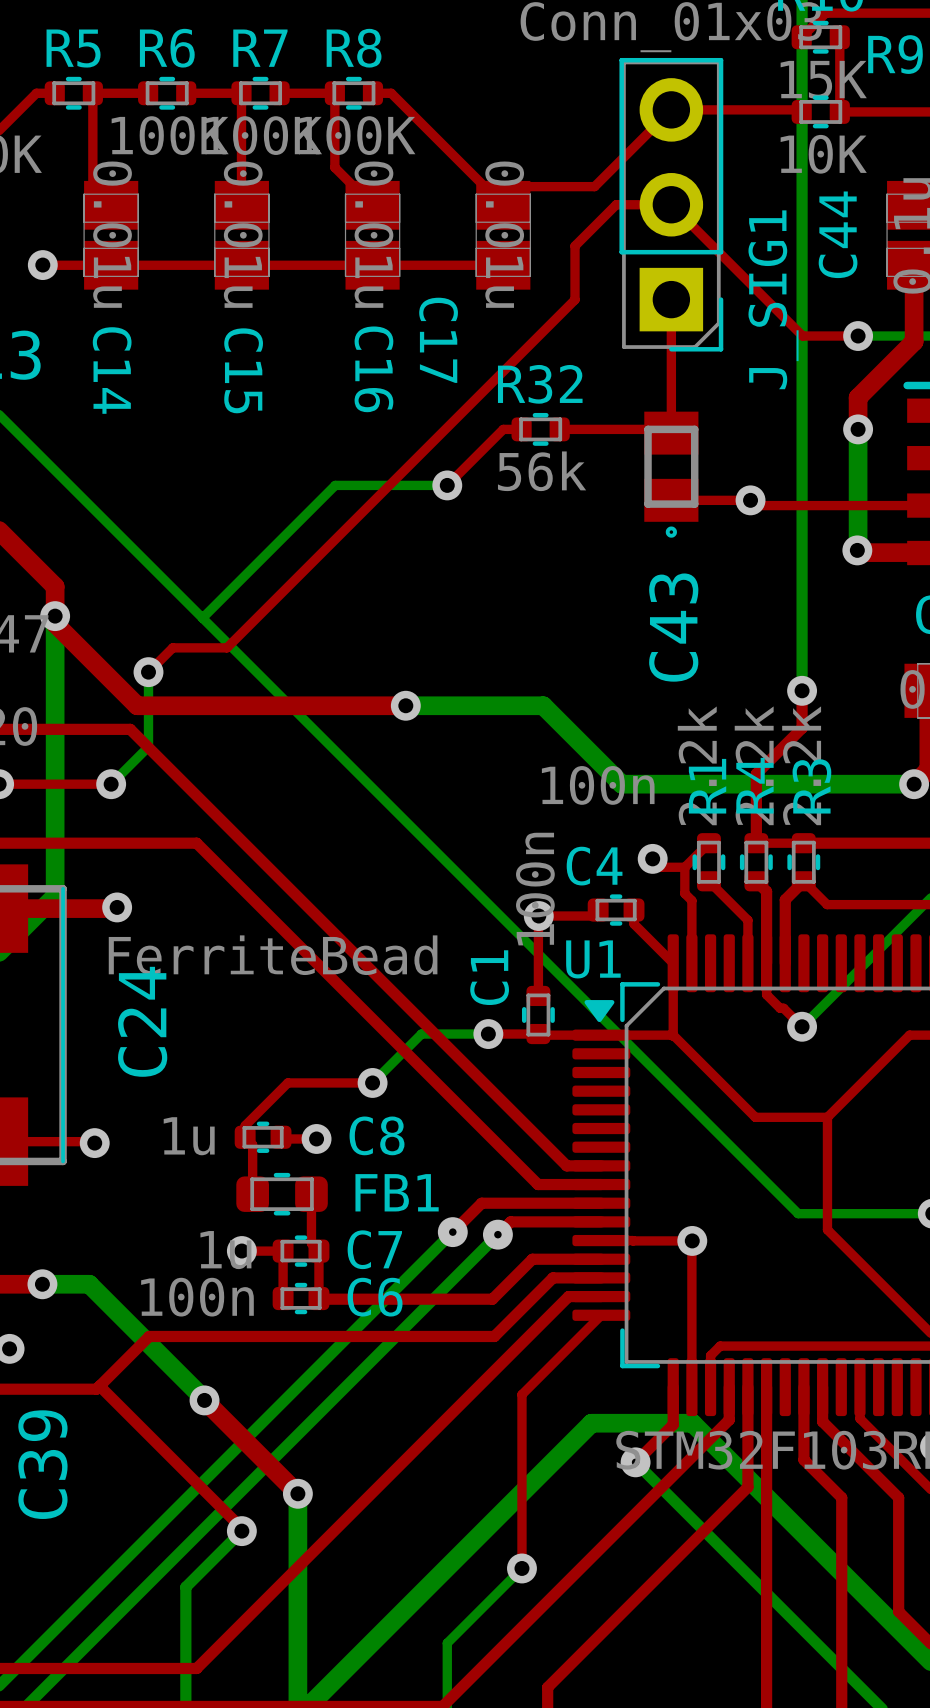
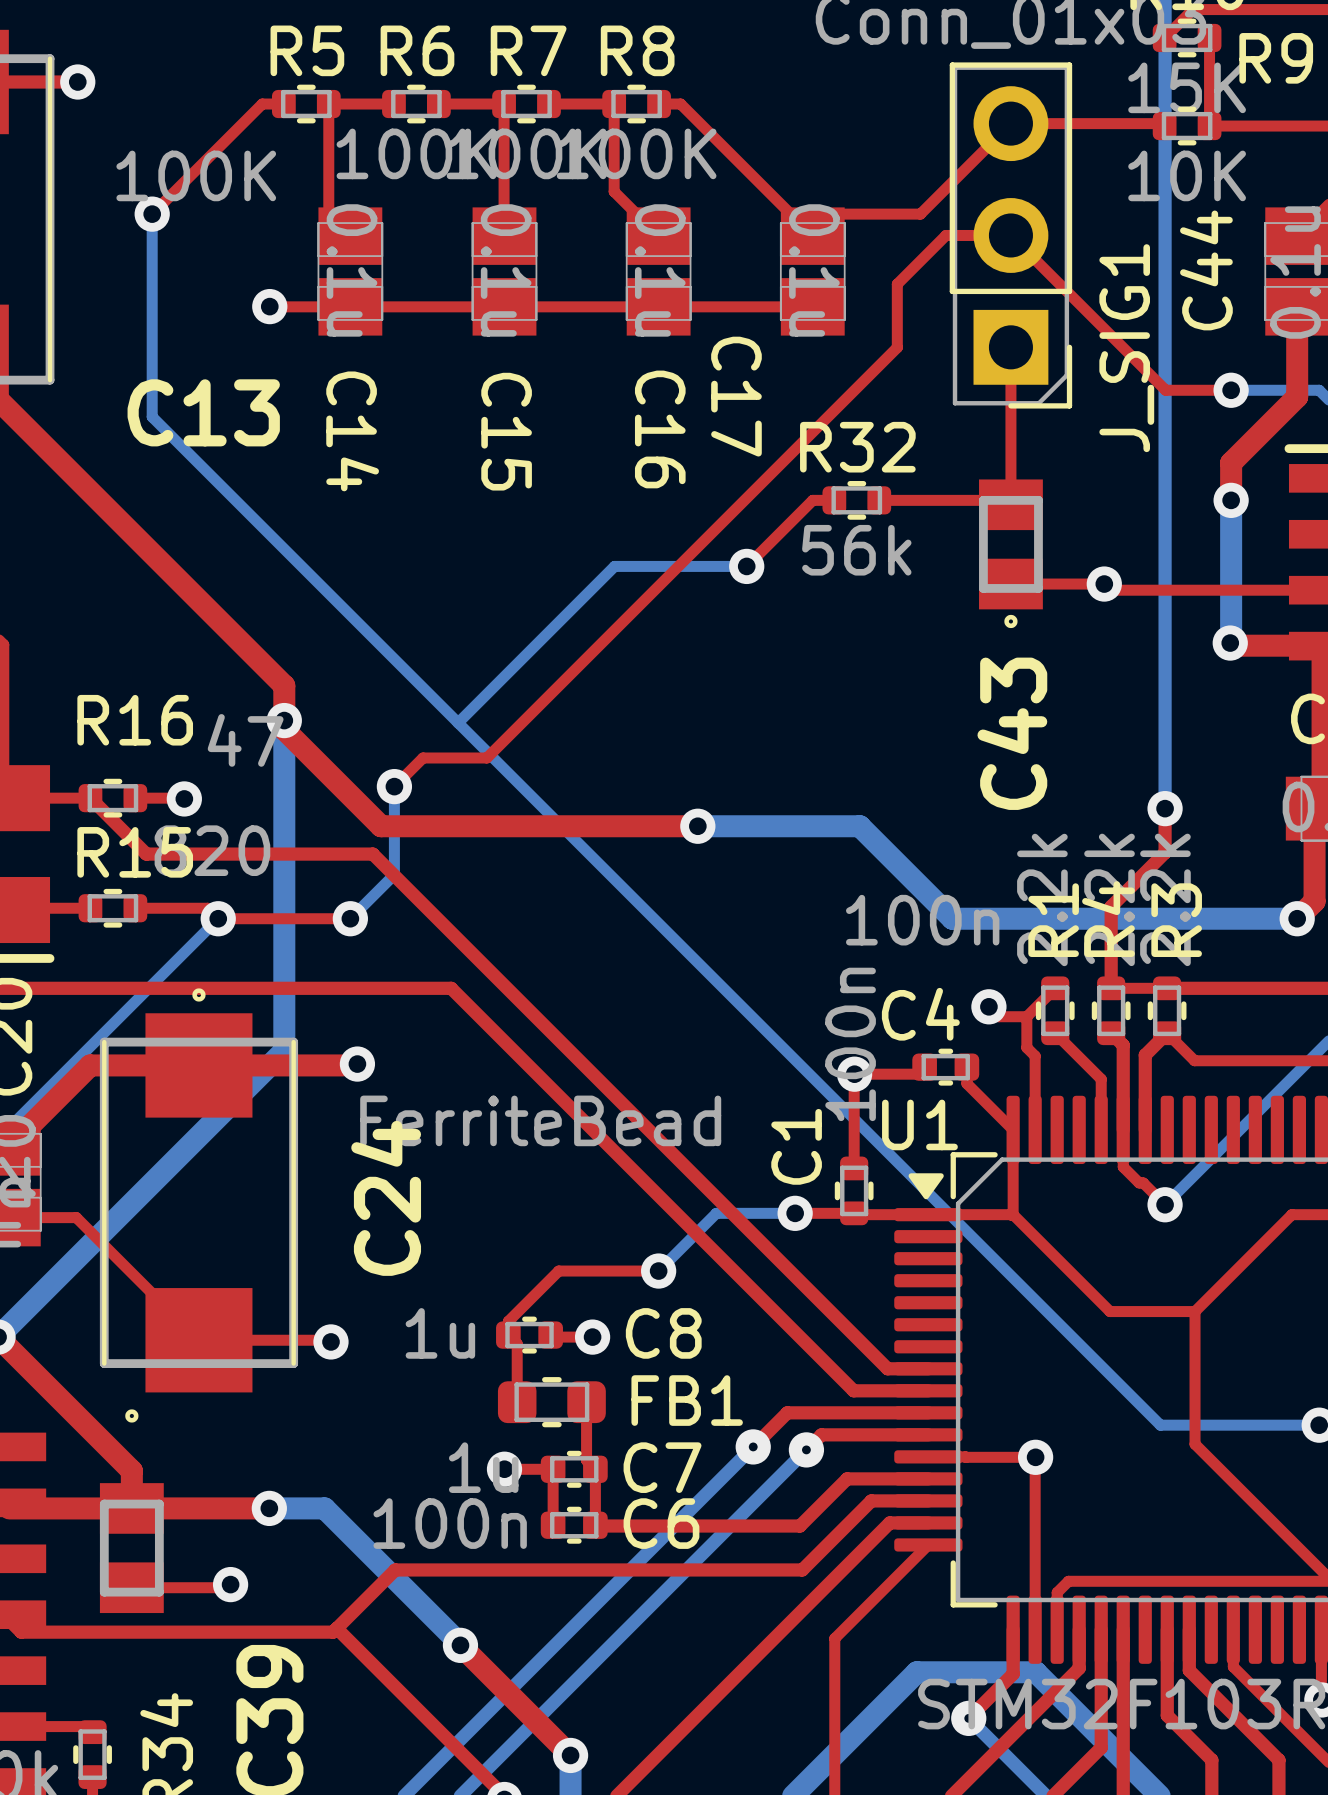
C14 value: 0.01u (112, 234) -> 0.1u (352, 270)
C15 value: 0.01u (243, 234) -> 0.1u (506, 270)
C16 value: 0.01u (373, 234) -> 0.1u (660, 270)
C17 value: 0.01u (504, 234) -> 0.1u (814, 270)

